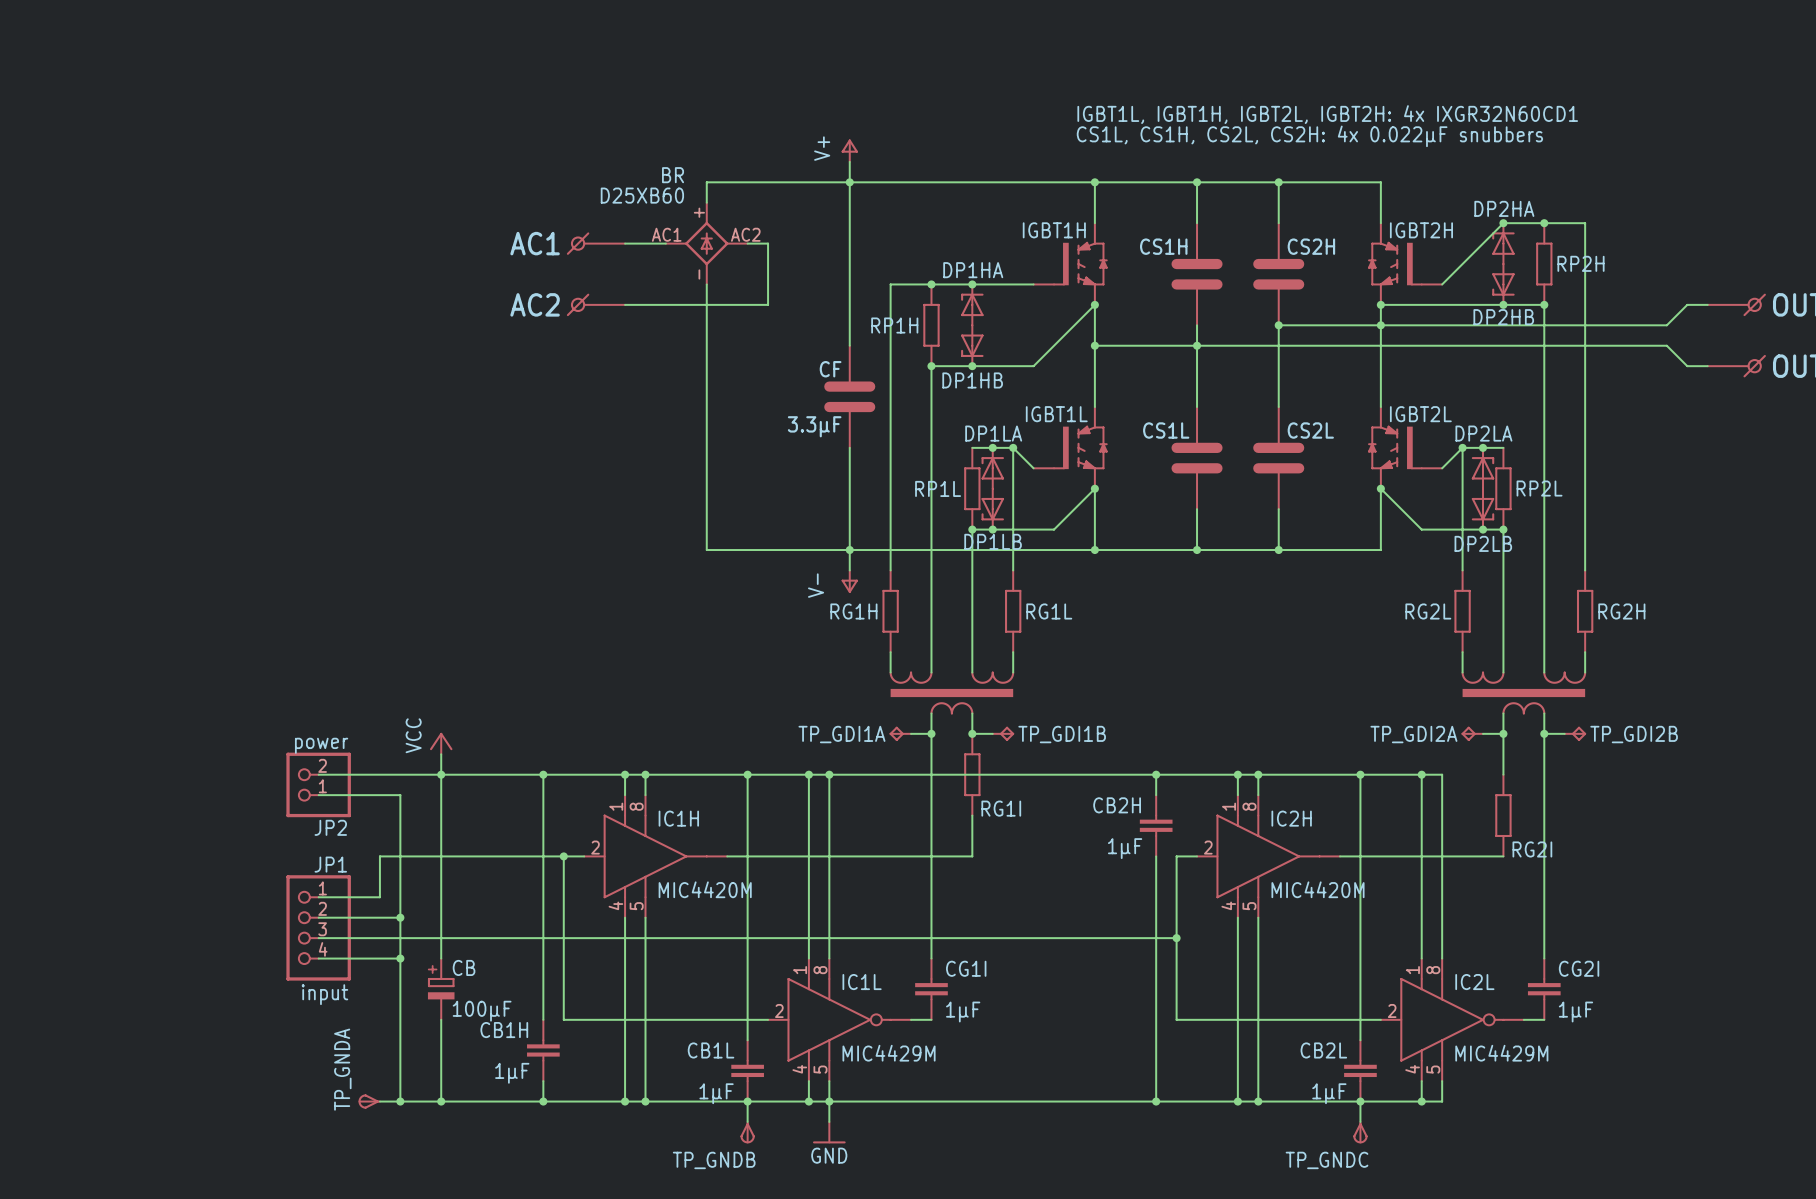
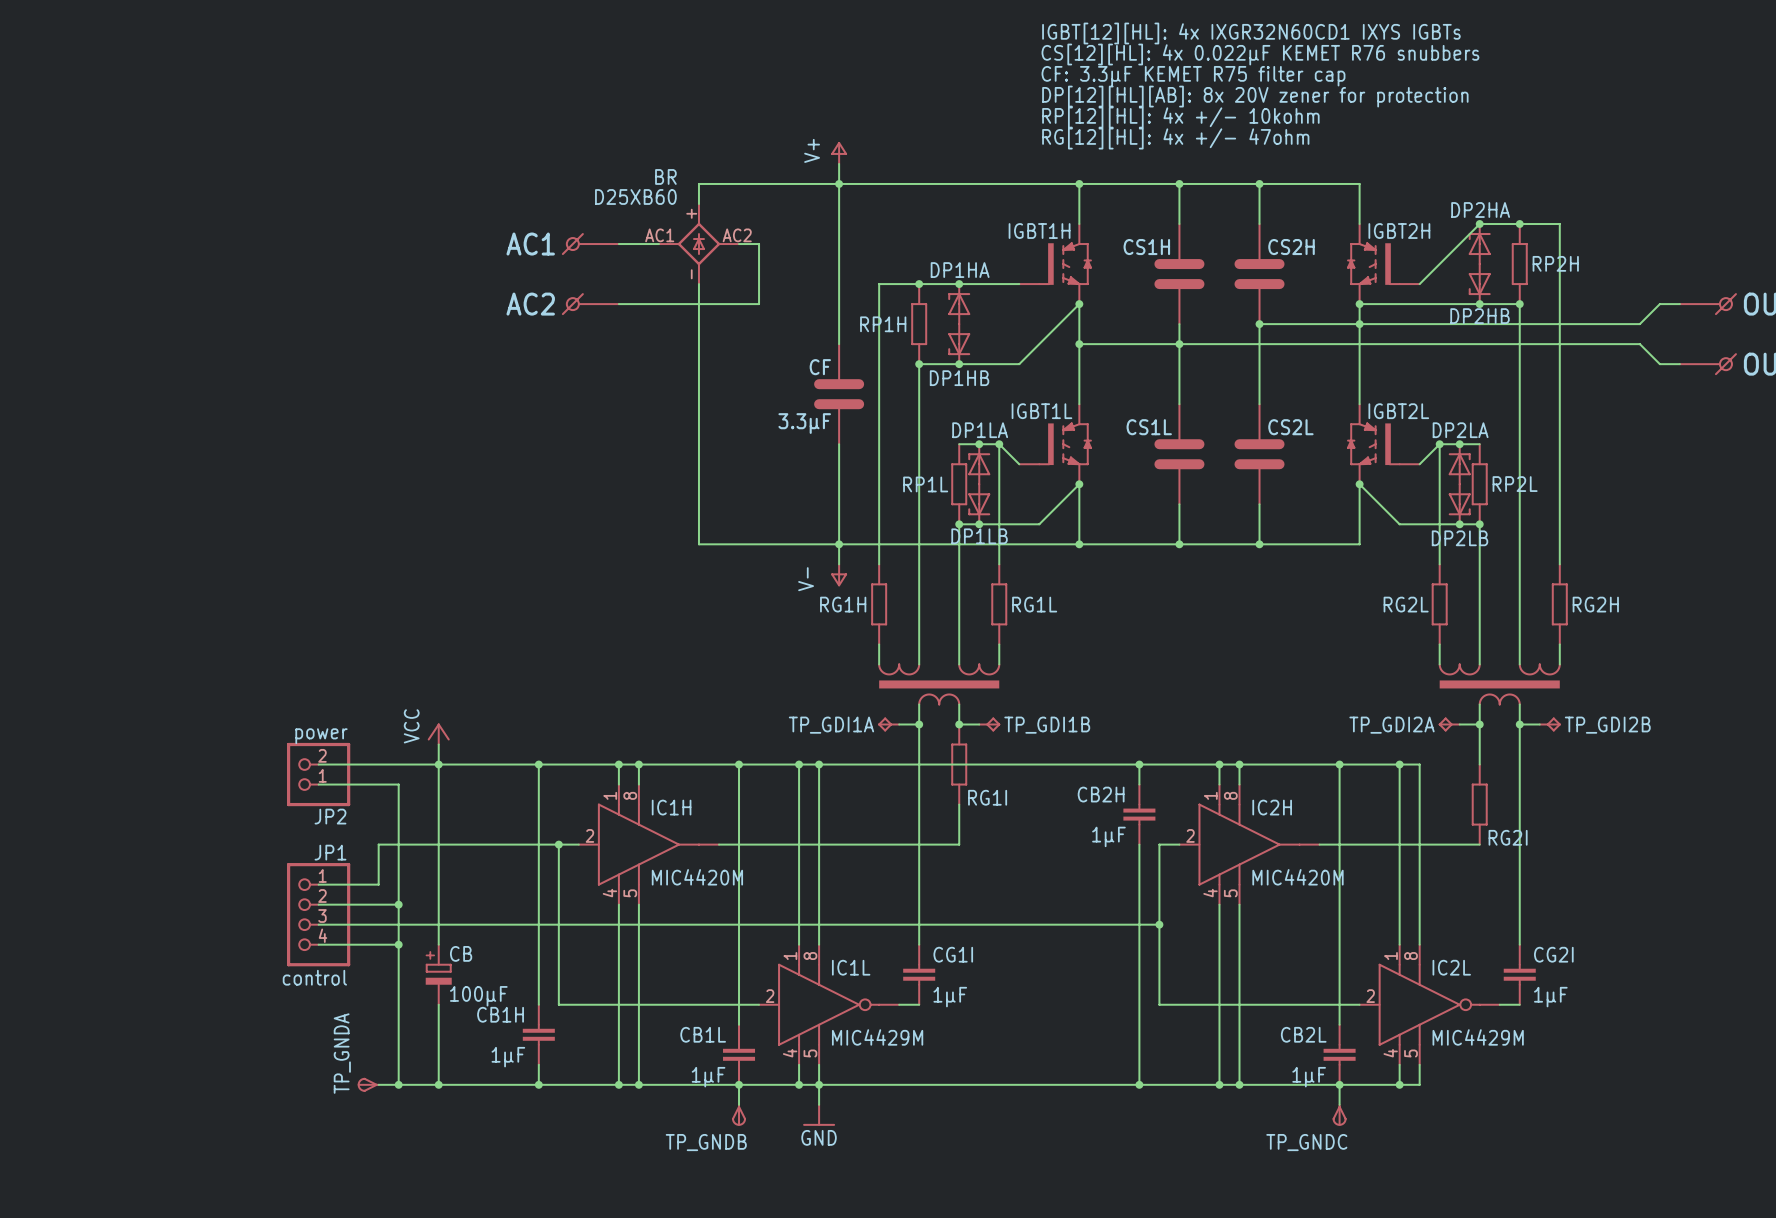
text: none -> IGBT[12][HL]: 4x IXGR32N60CD1 IXYS IGBTs (1251, 33)
text: none -> CS[12][HL]: 4x 0.022µF KEMET R76 snubbers (1260, 54)
text: none -> CF: 3.3µF KEMET R75 filter cap (1193, 76)
text: none -> DP[12][HL][AB]: 8x 20V zener for protection (1255, 96)
text: none -> RP[12][HL]: 4x +/- 10kohm (1180, 117)
text: IGBT1L, IGBT1H, IGBT2L, IGBT2H: 4x IXGR32N60CD1 (1327, 114) -> none
text: none -> RG[12][HL]: 4x +/- 47ohm (1175, 138)
text: CS1L, CS1H, CS2L, CS2H: 4x 0.022µF snubbers (1309, 136) -> none
JP1 value: input (324, 994) -> control (314, 977)

